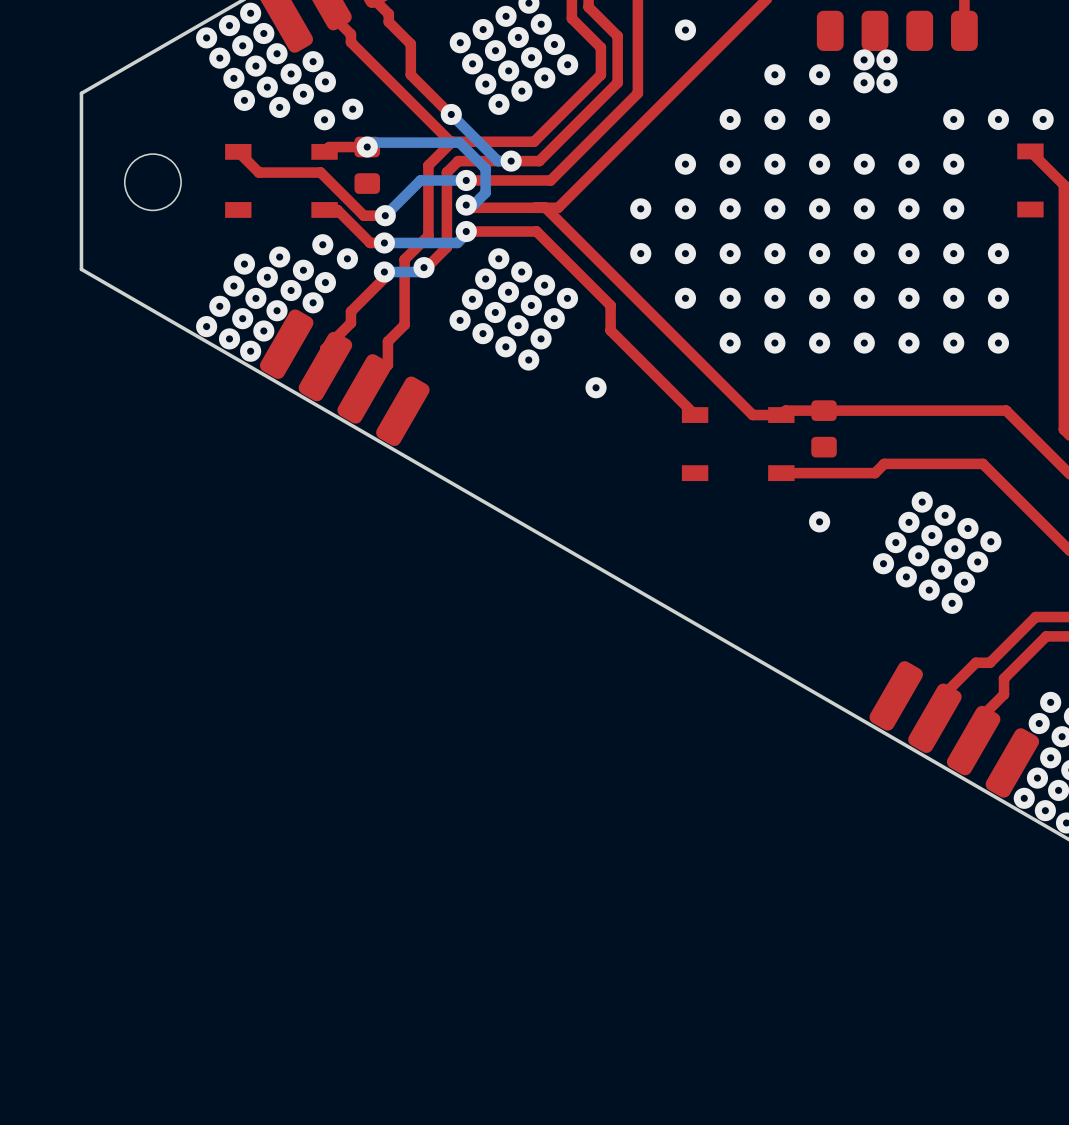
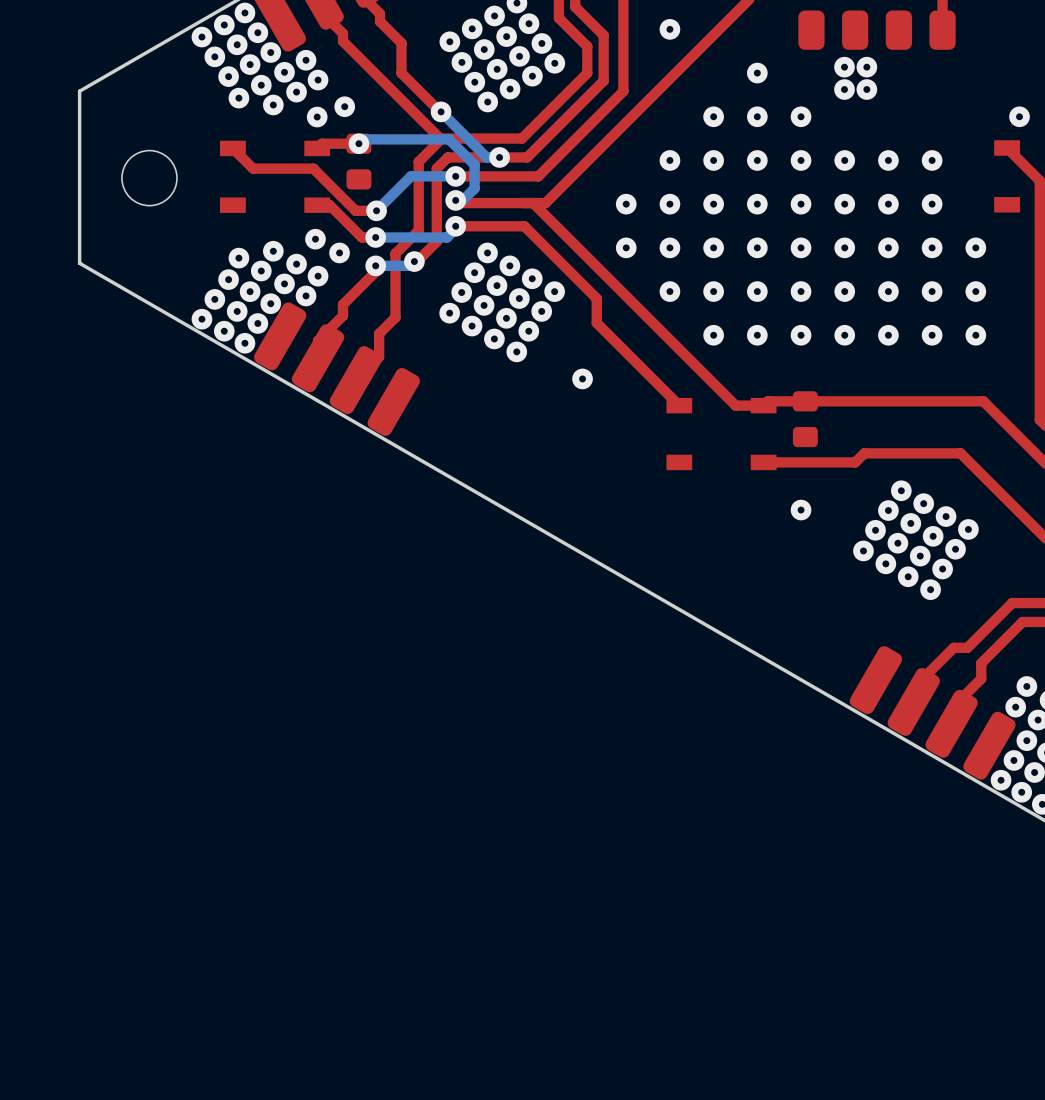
via: (864, 59) -> none
via: (886, 59) -> none
via: none -> (844, 67)
via: none -> (866, 67)
via: (819, 74) -> none
via: (864, 82) -> none
via: (886, 82) -> none
via: none -> (844, 89)
via: none -> (866, 89)
via: (953, 119) -> none
via: (998, 119) -> none

